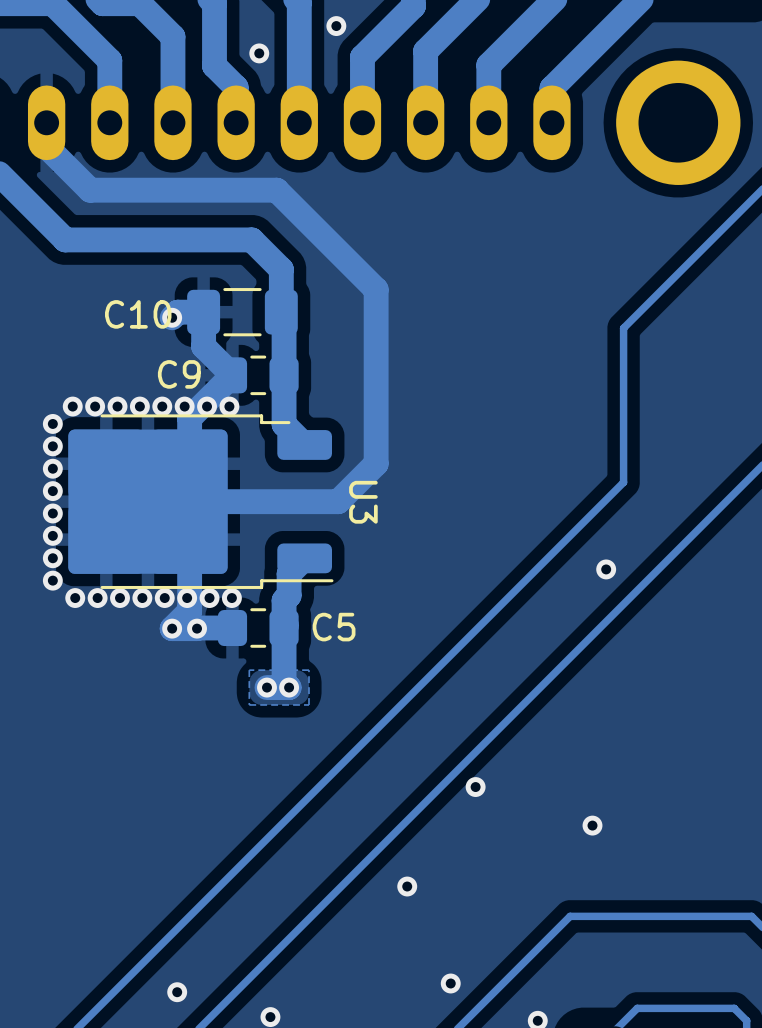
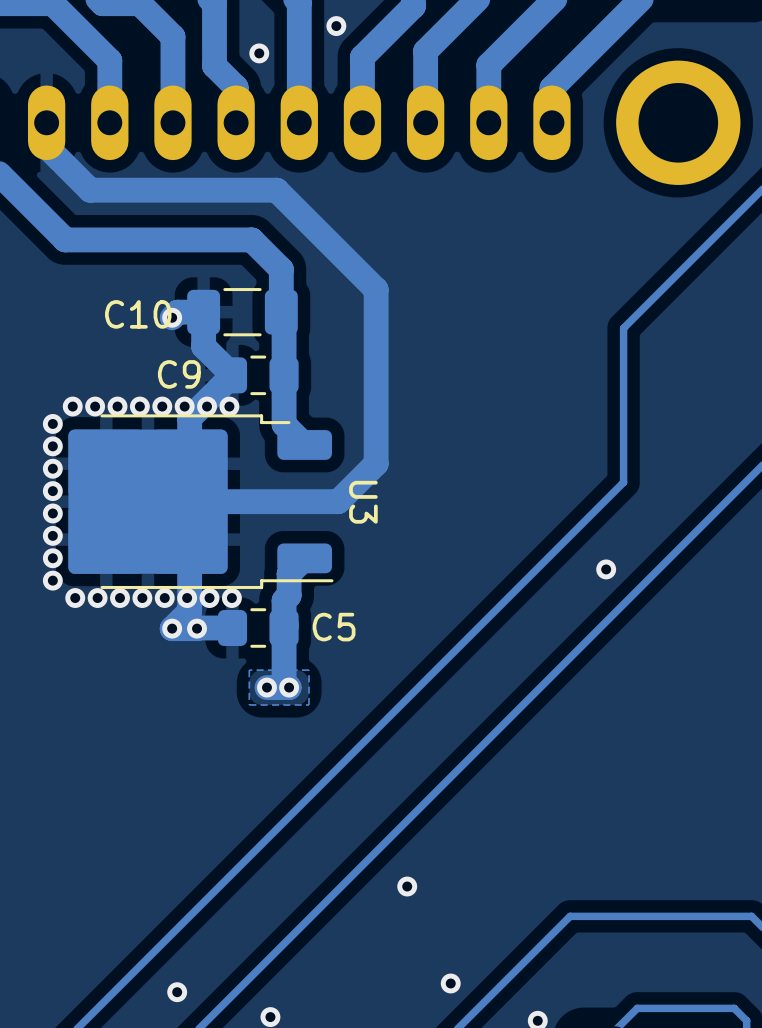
via: (475, 787) -> none
via: (592, 825) -> none

